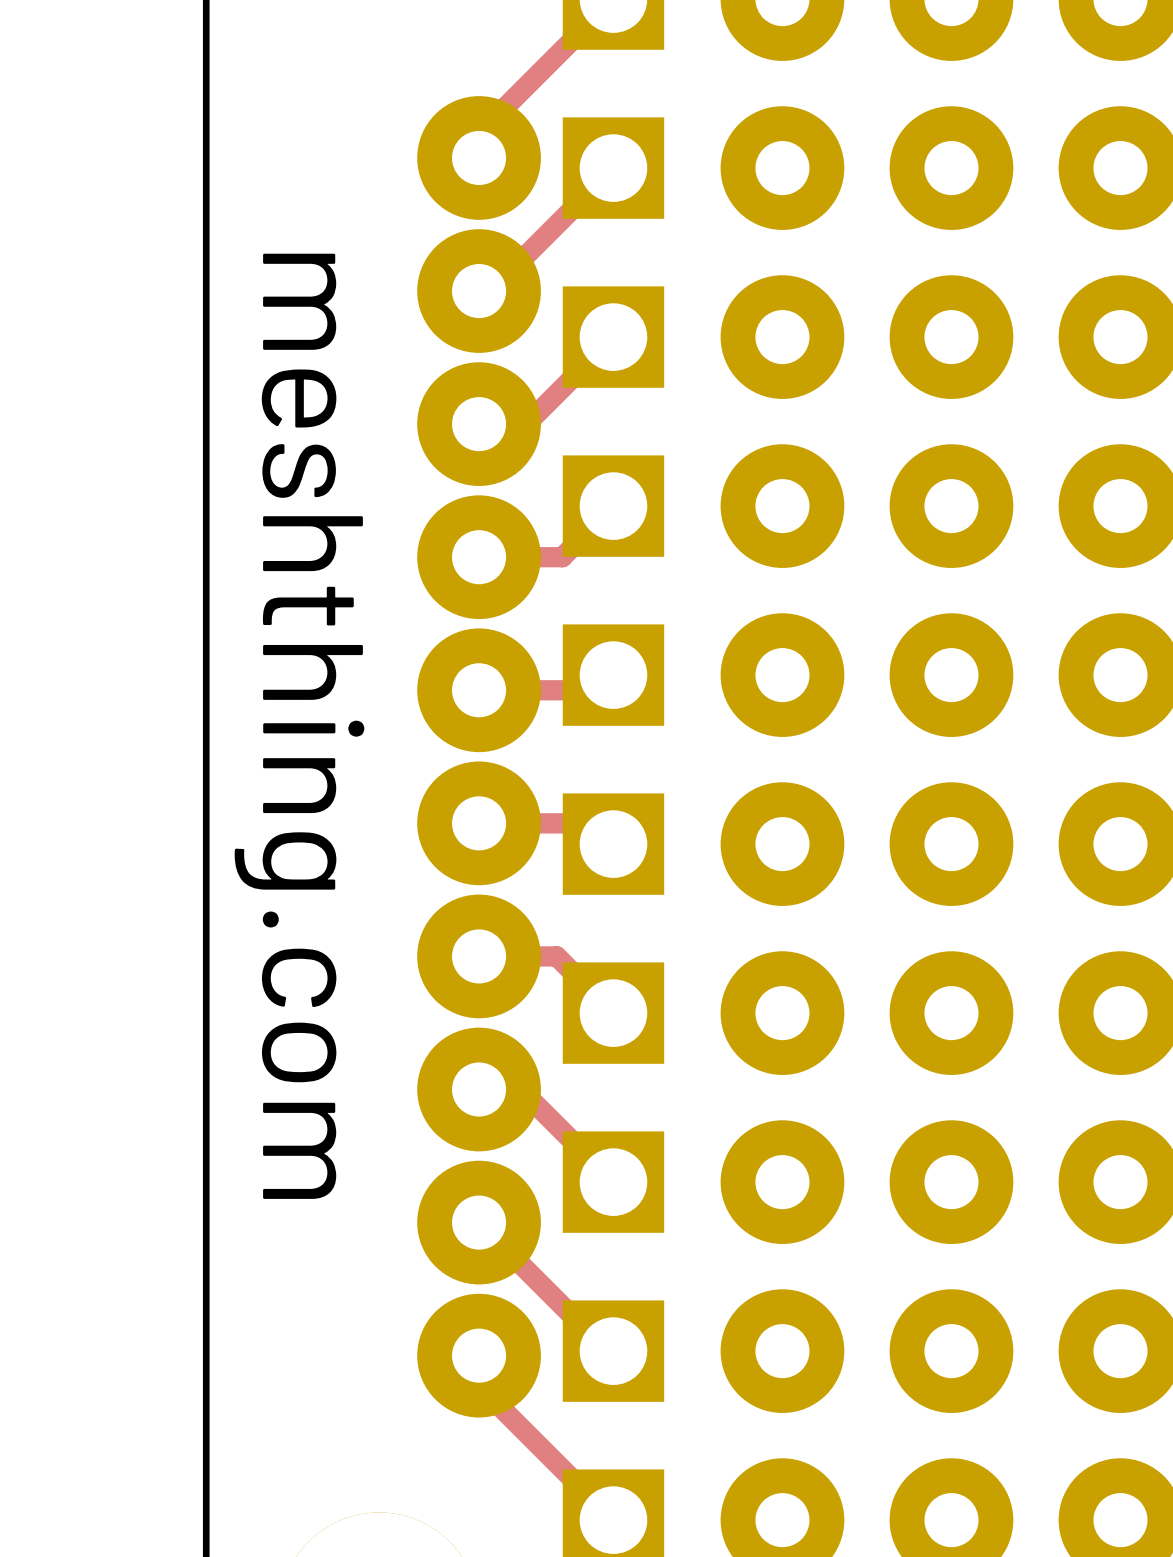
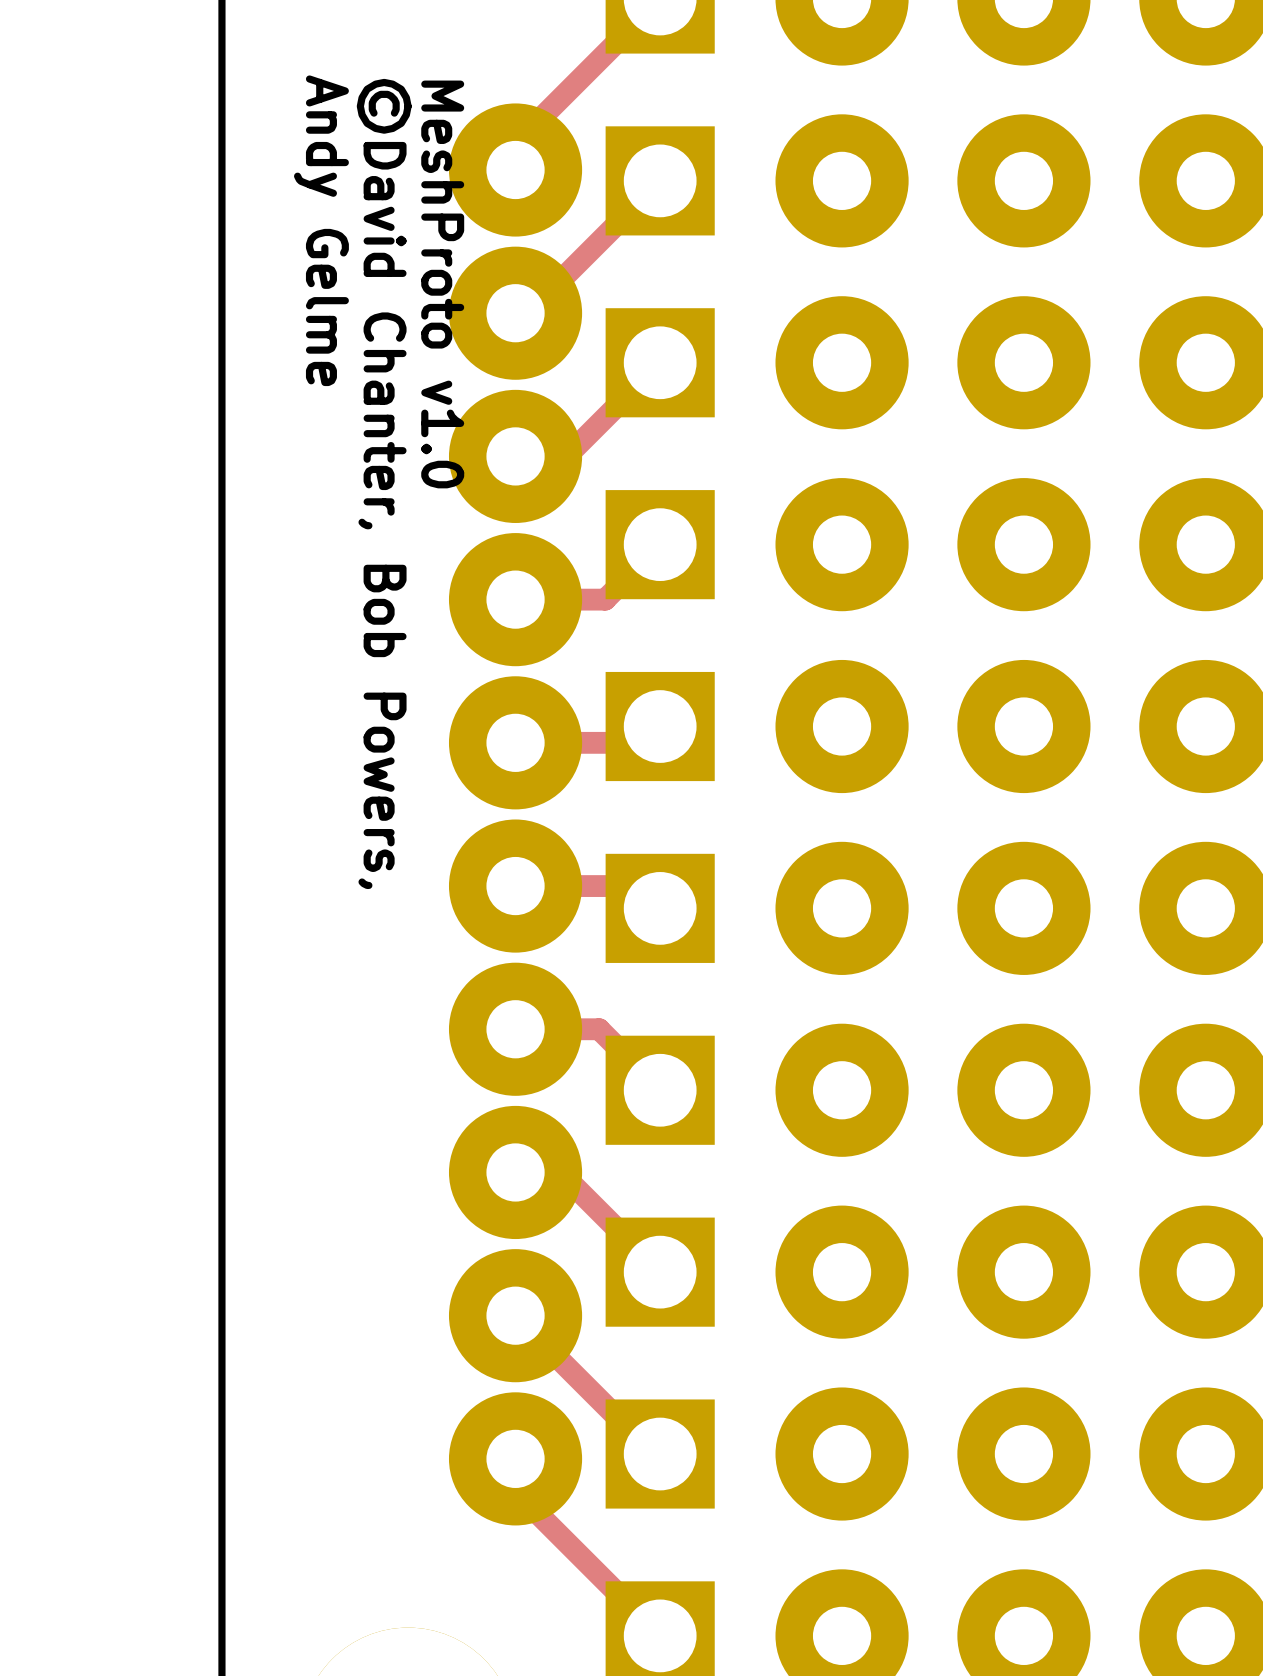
text: none -> Andy Gelme (321, 230)
text: none -> MeshProto v1.0 (442, 284)
text: none -> ©David Chanter, Bob Powers, (384, 483)
text: meshthing.com (299, 726) -> none

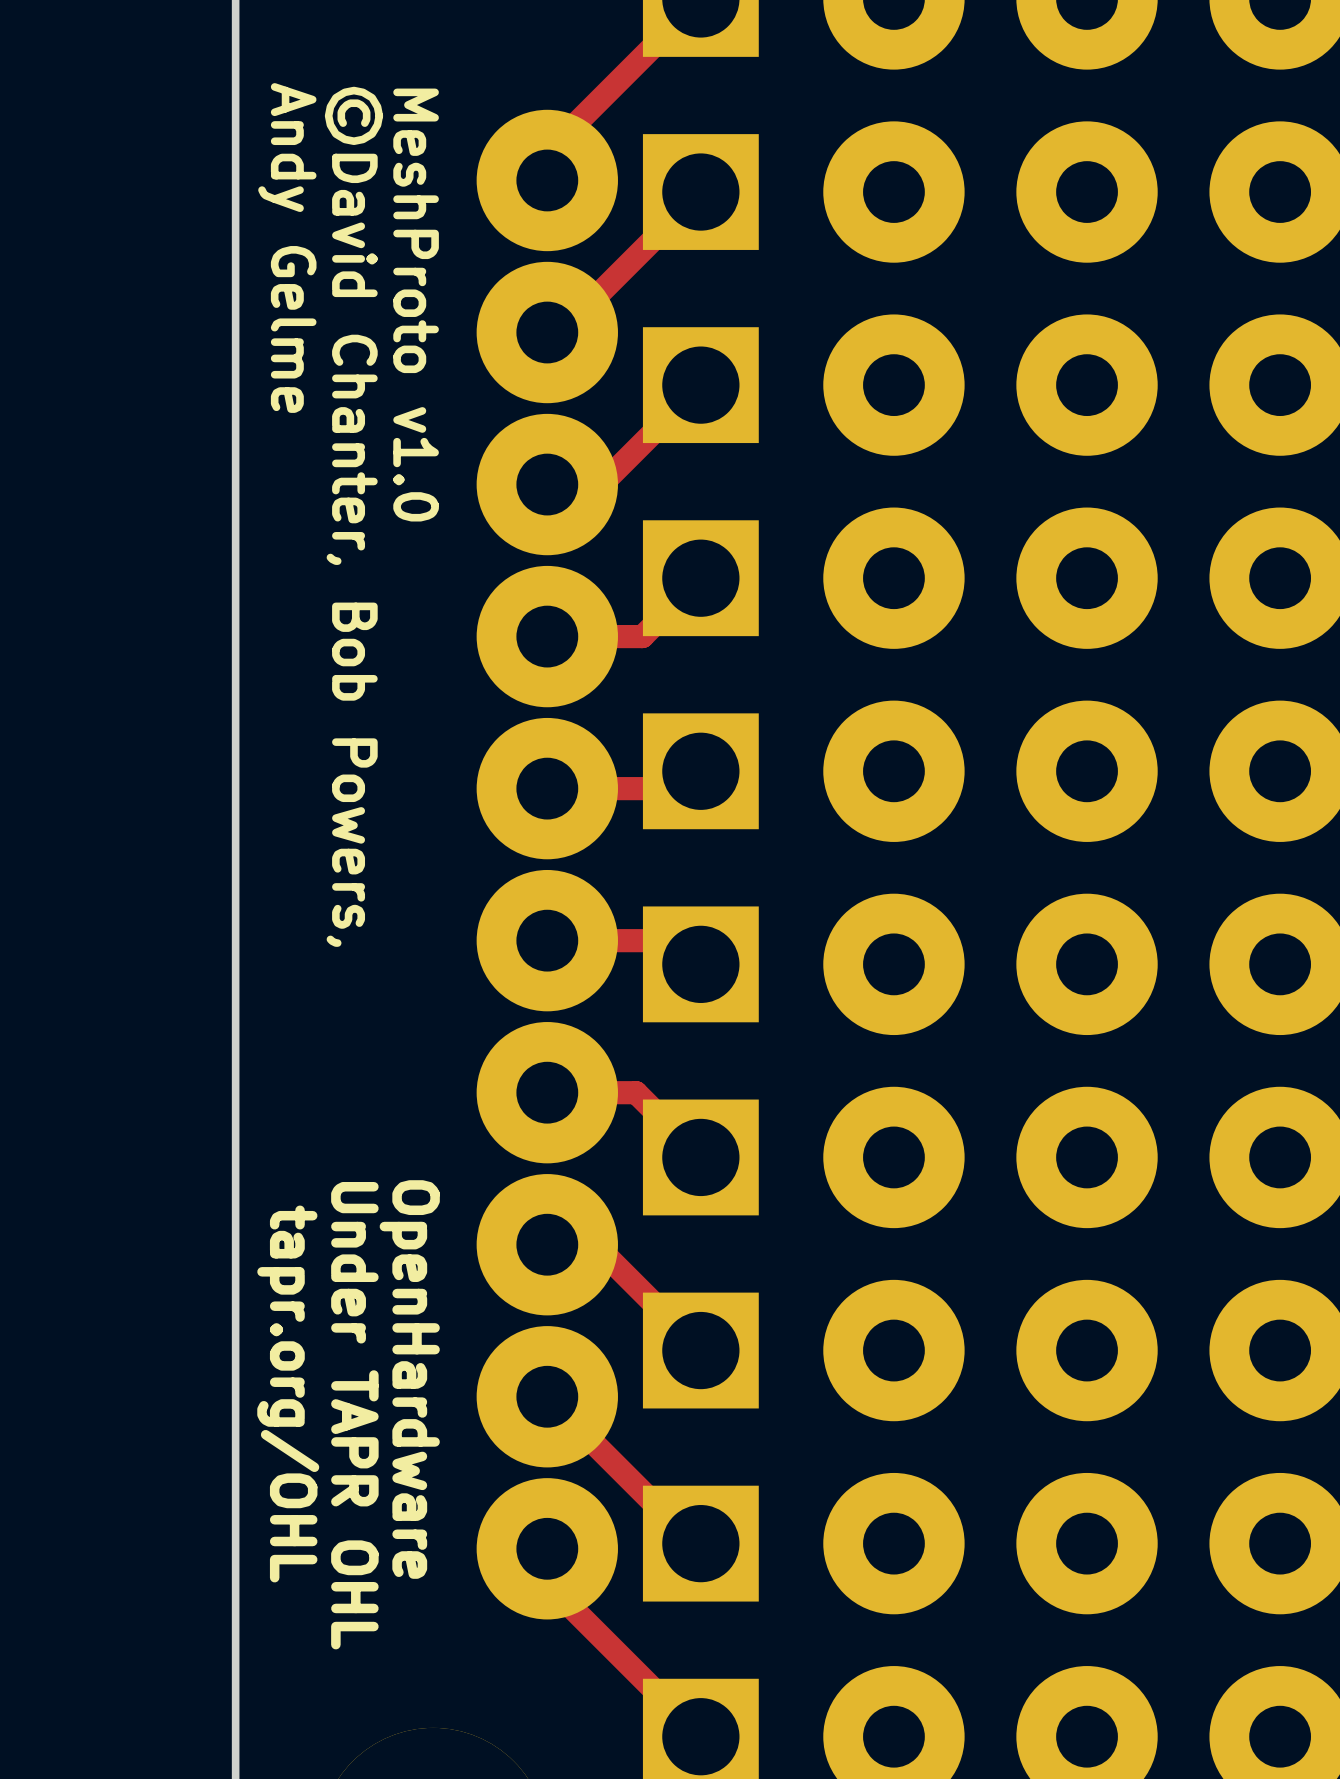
text position: Andy Gelme (321, 230) -> Andy Gelme (287, 248)
text position: MeshProto v1.0 (442, 284) -> MeshProto v1.0 (416, 305)
text position: ©David Chanter, Bob Powers, (384, 483) -> ©David Chanter, Bob Powers, (353, 516)
text: none -> OpenHardware (409, 1379)
text: none -> tapr.org/OHL (288, 1393)
text: none -> Under TAPR OHL (354, 1415)

